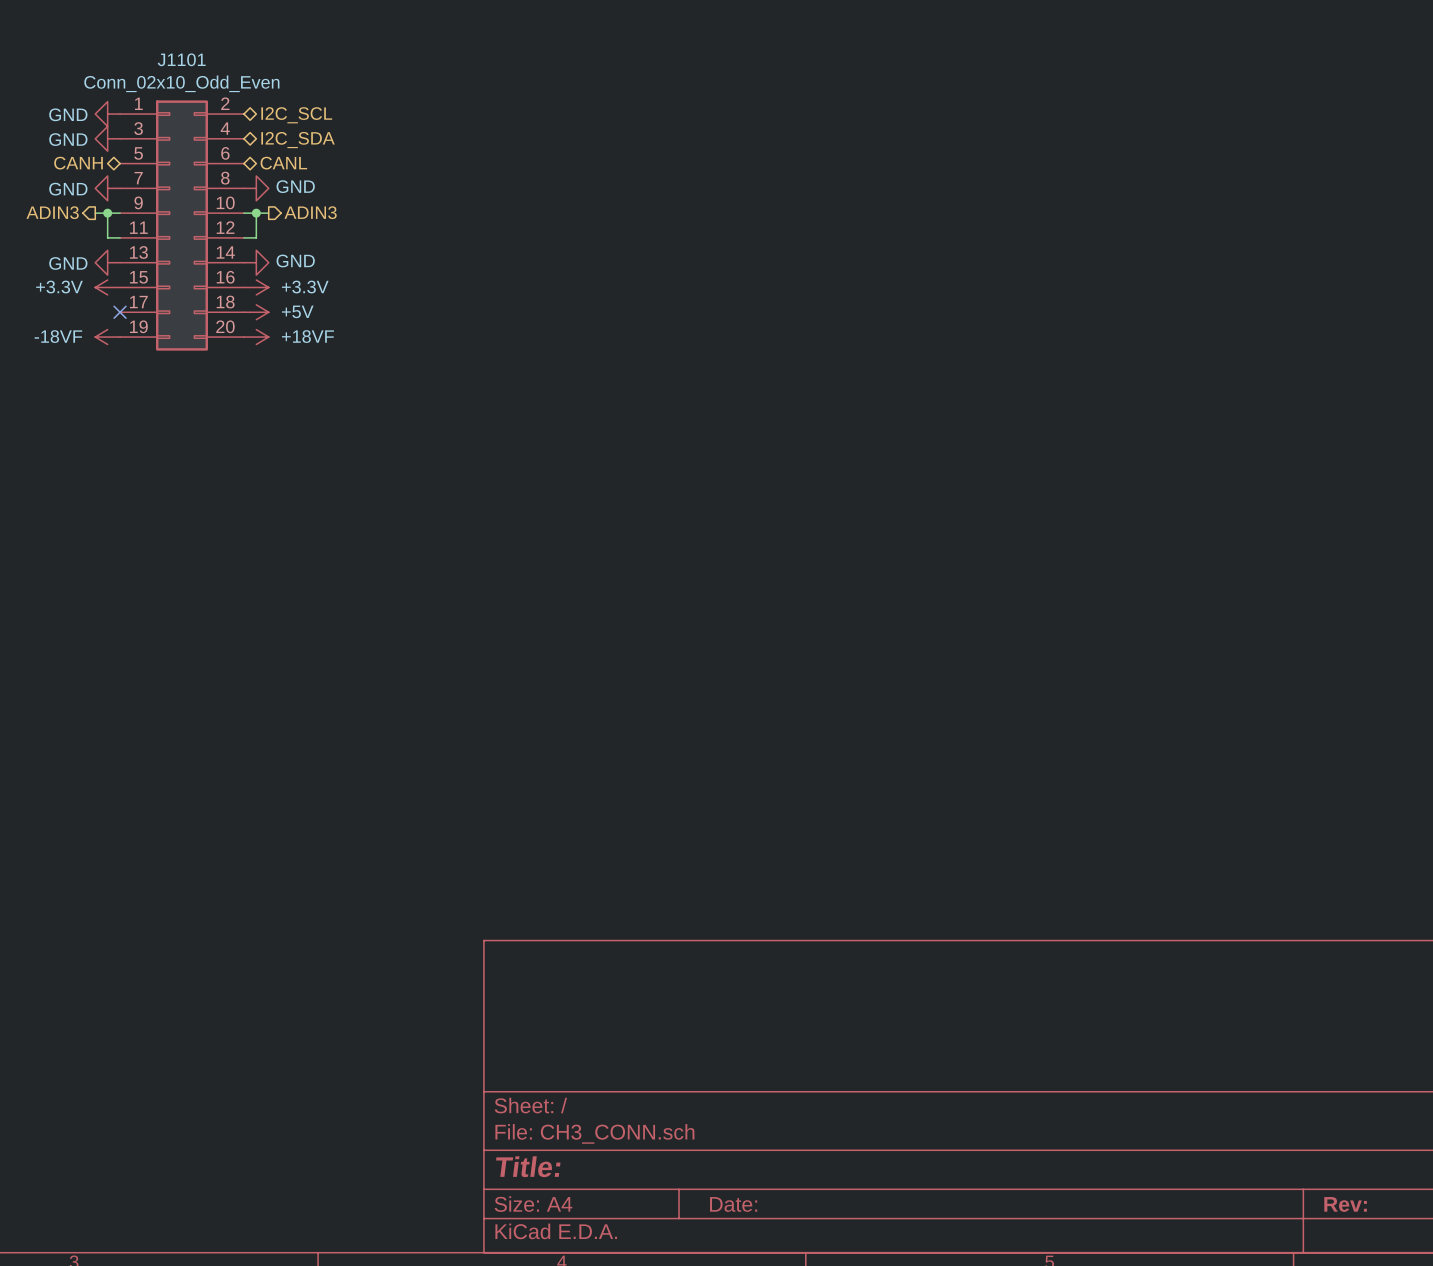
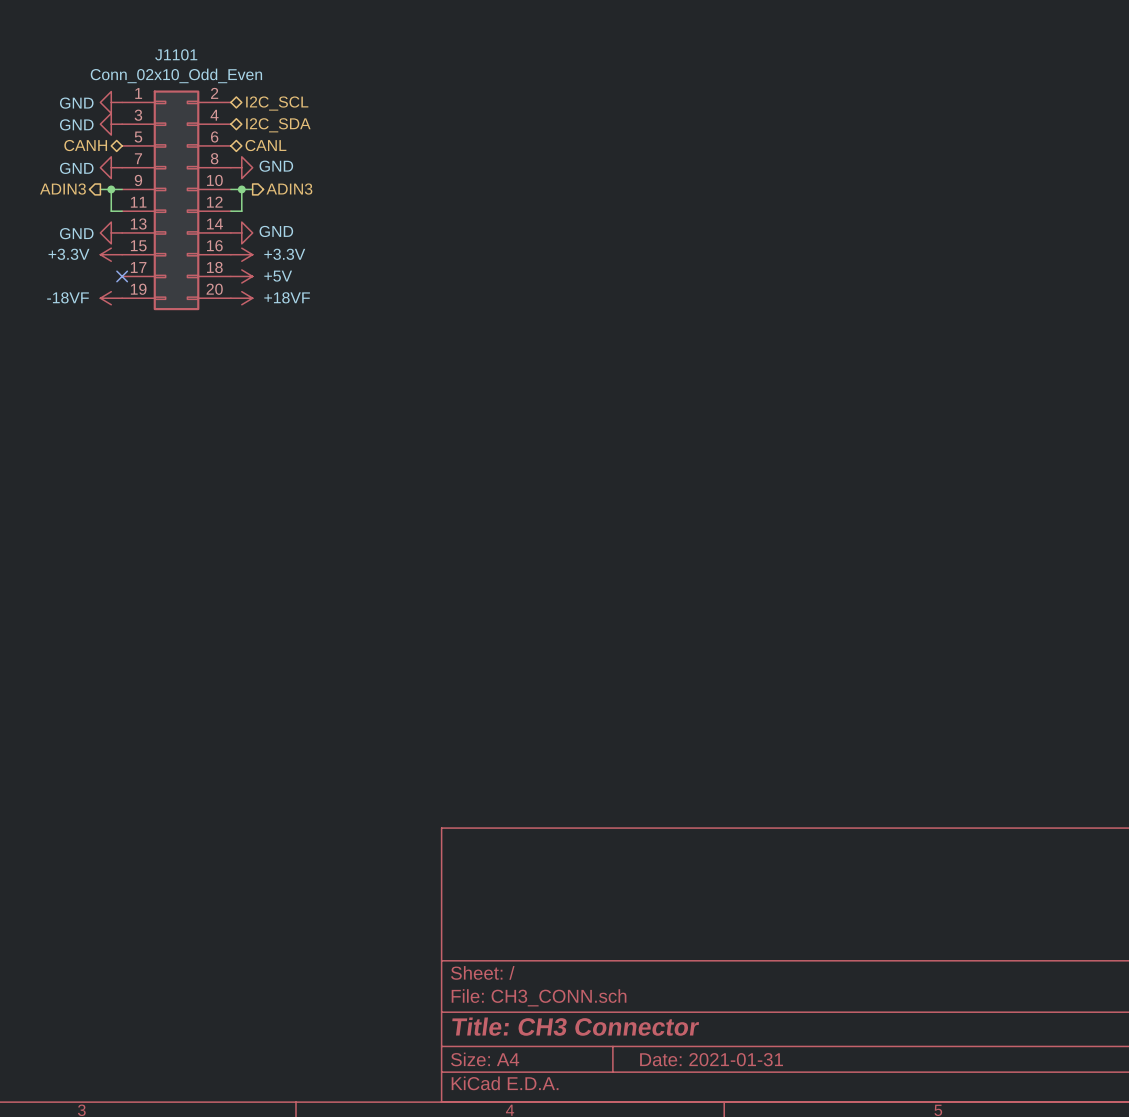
title block: Title: (528, 1166) -> Title: CH3 Connector (575, 1026)
title block: Date: (733, 1204) -> Date: 2021-01-31 (711, 1059)

